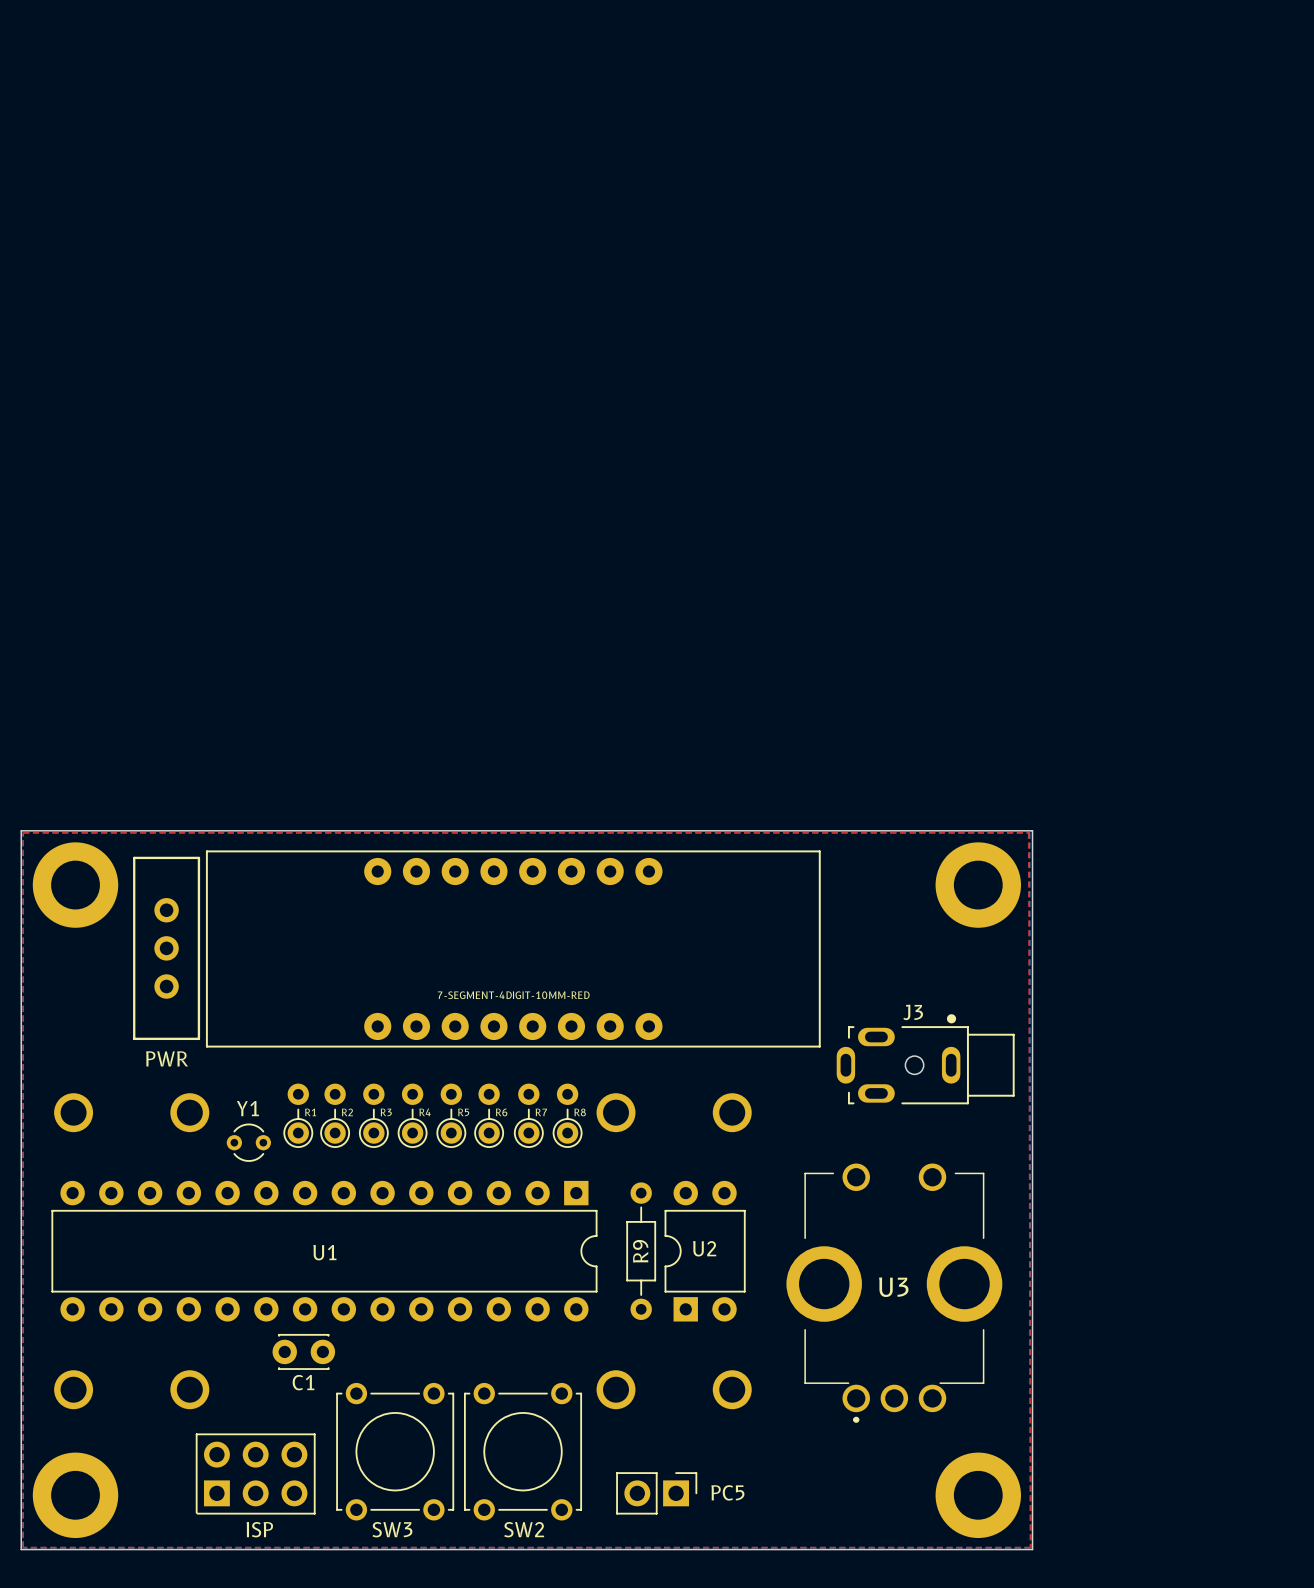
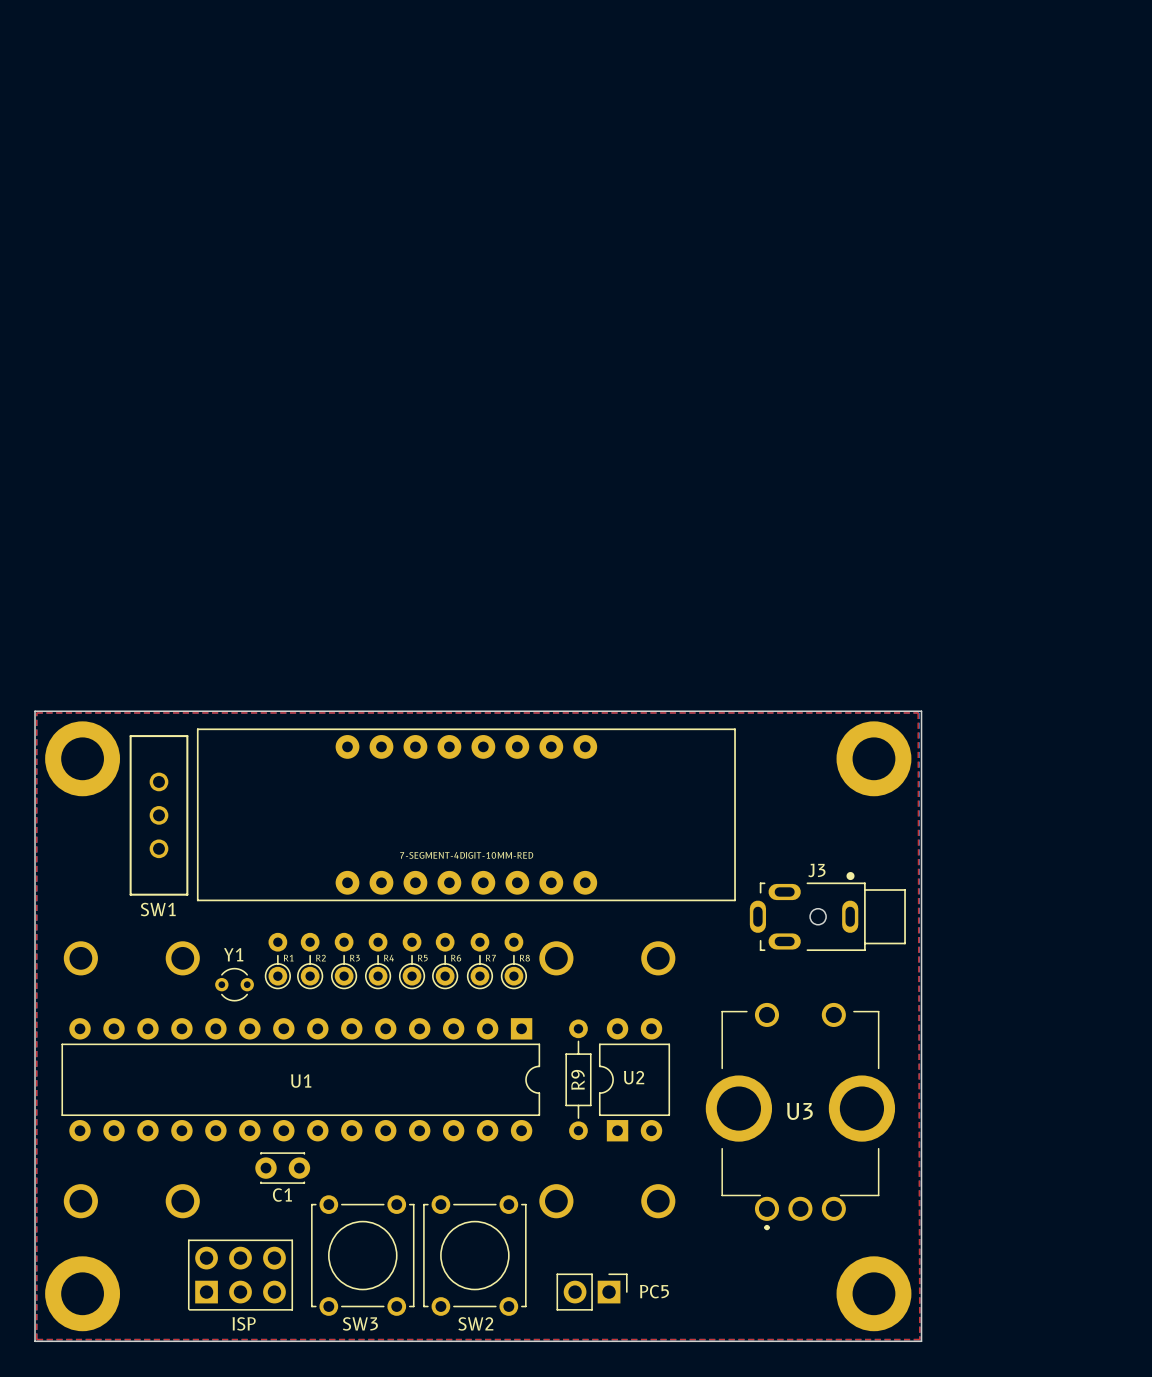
part: (166, 948) -> none
SW1: none -> (158, 815)
text: PWR (167, 1058) -> none

